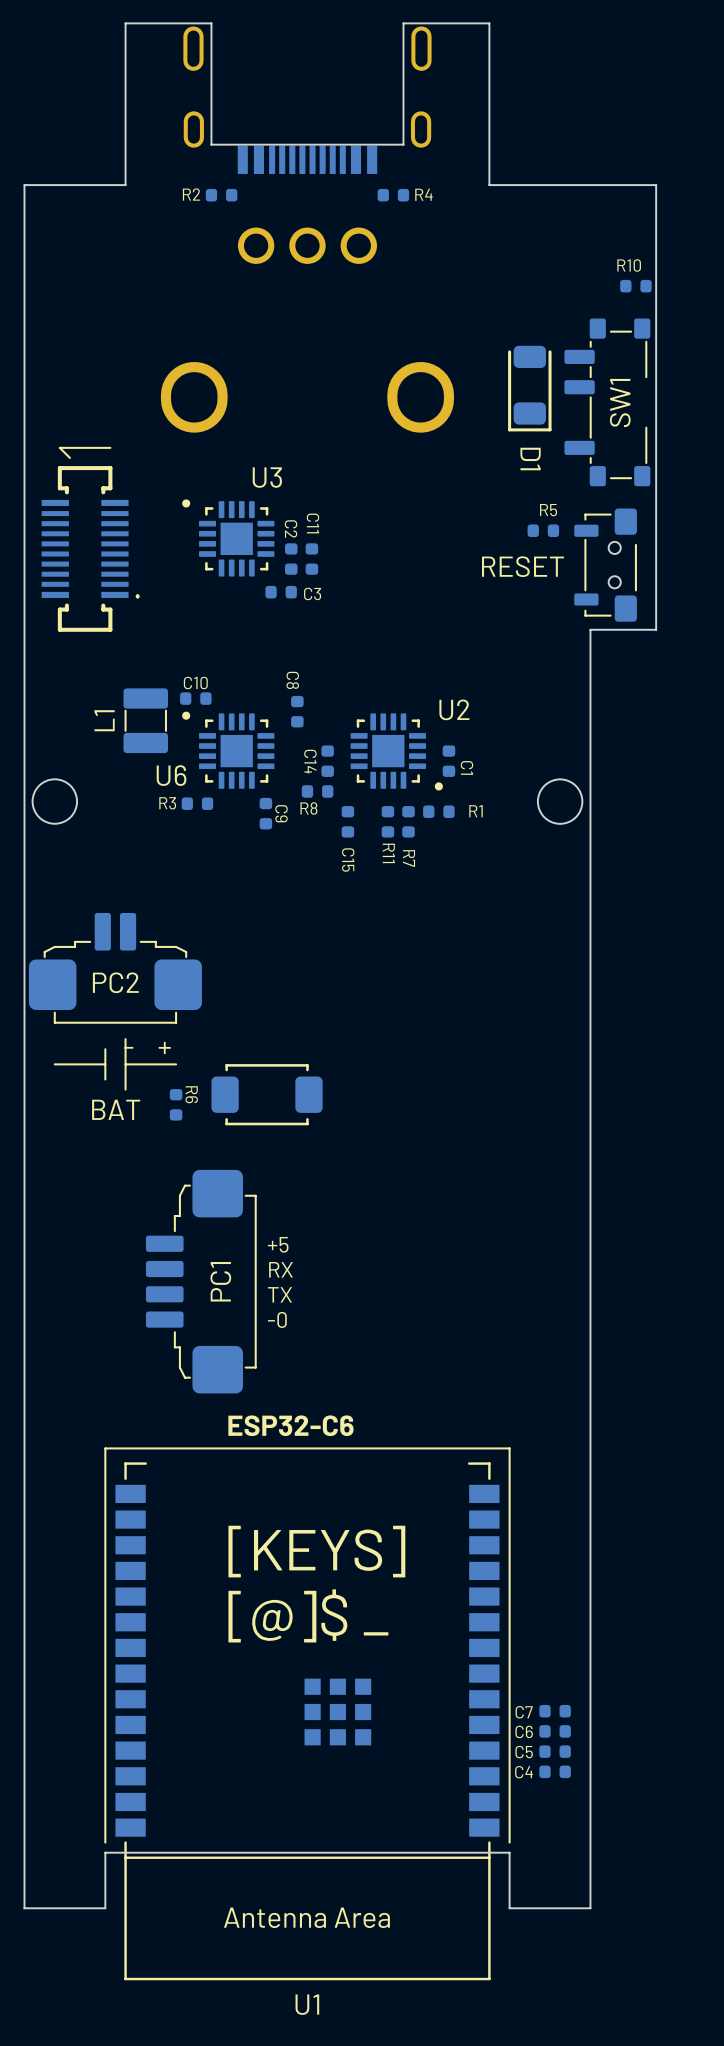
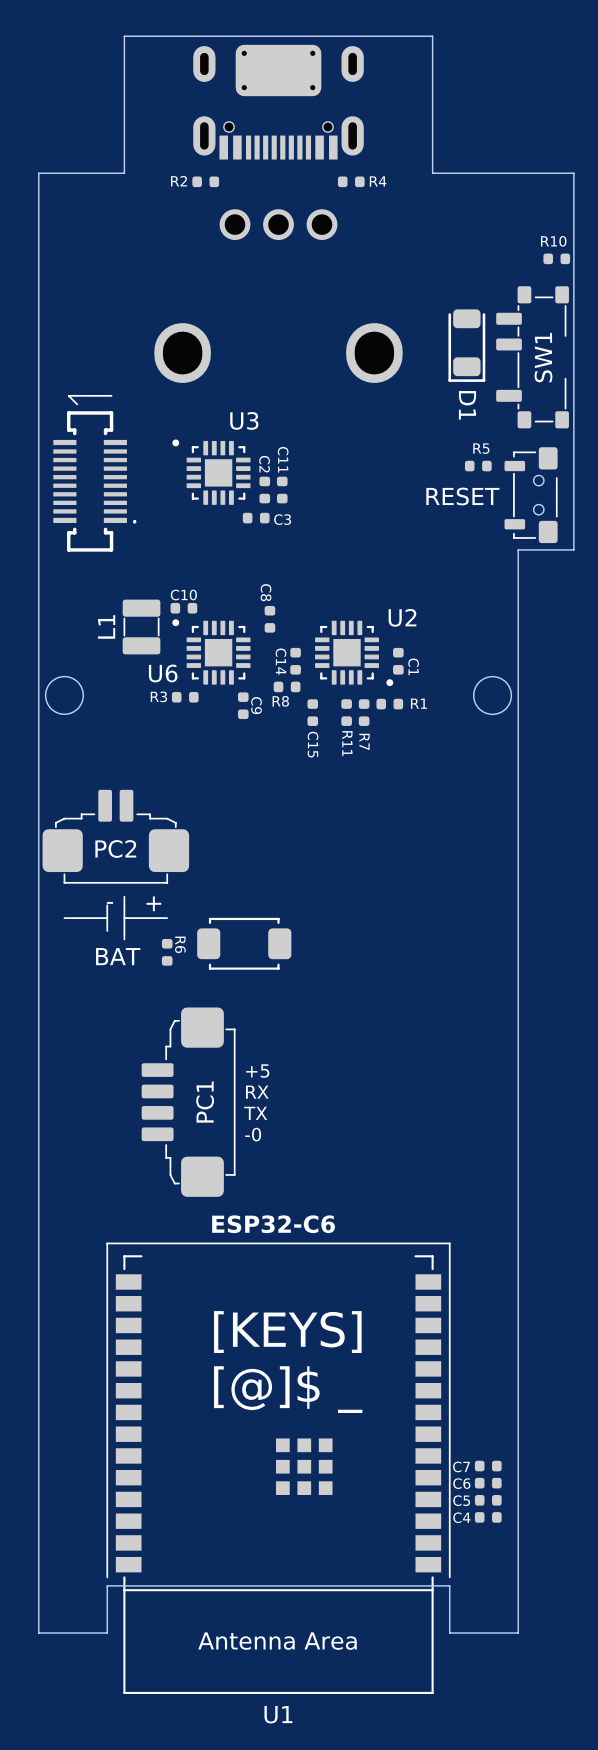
board edge: (403, 23) (403, 144) (211, 144) (211, 23) -> (359, 36) (197, 36)
part footprint: [183, 26, 432, 174] -> [193, 44, 364, 160]

